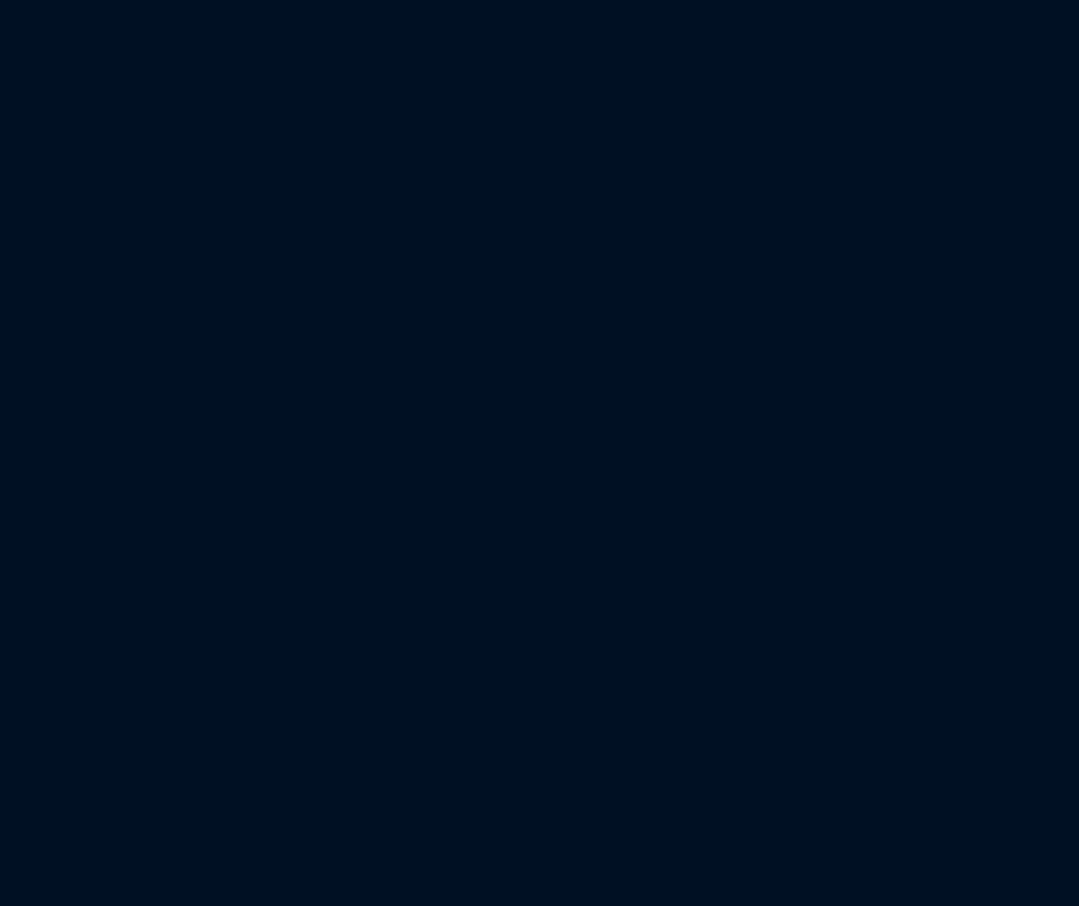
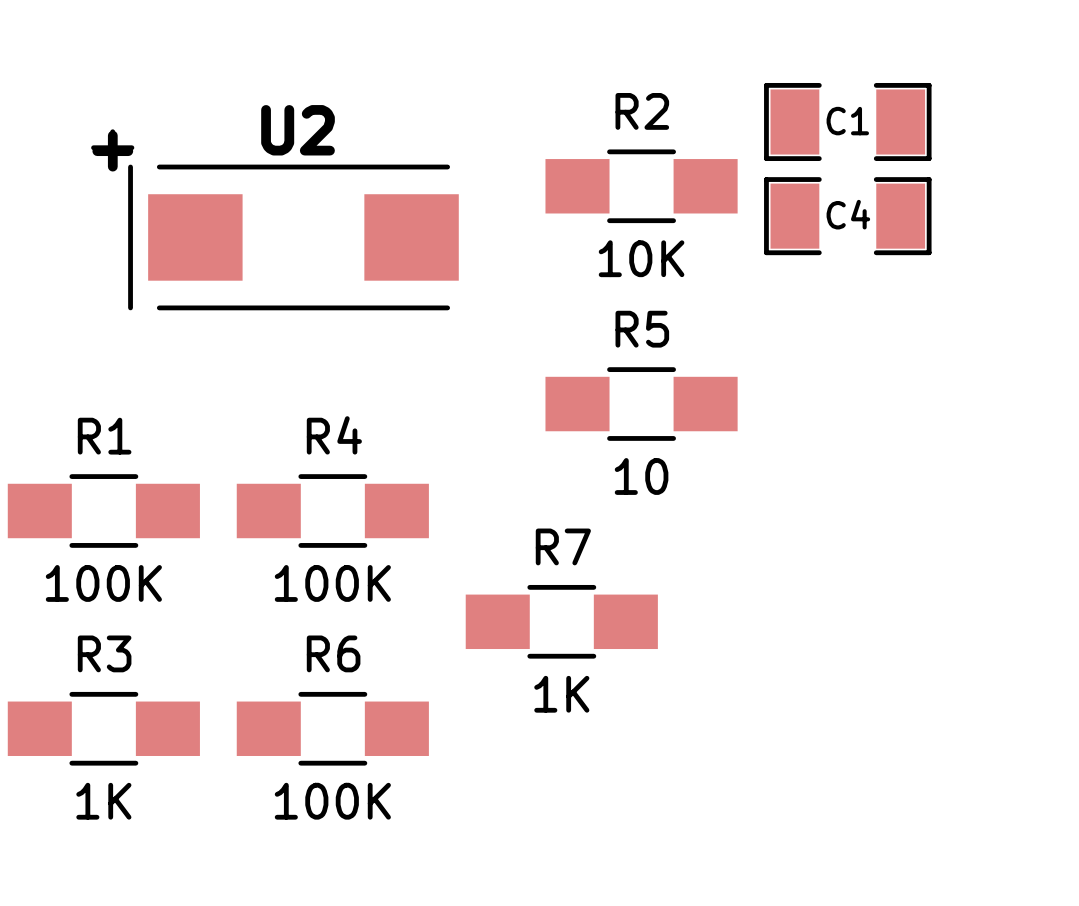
C1: none -> (847, 121)
R2: none -> 10K (641, 186)
C4: none -> (847, 216)
U2: none -> (274, 219)
R5: none -> 10 (641, 404)
R1: none -> 100K (103, 510)
R4: none -> 100K (332, 510)
R7: none -> 1K (561, 621)
R3: none -> 1K (103, 728)
R6: none -> 100K (332, 728)

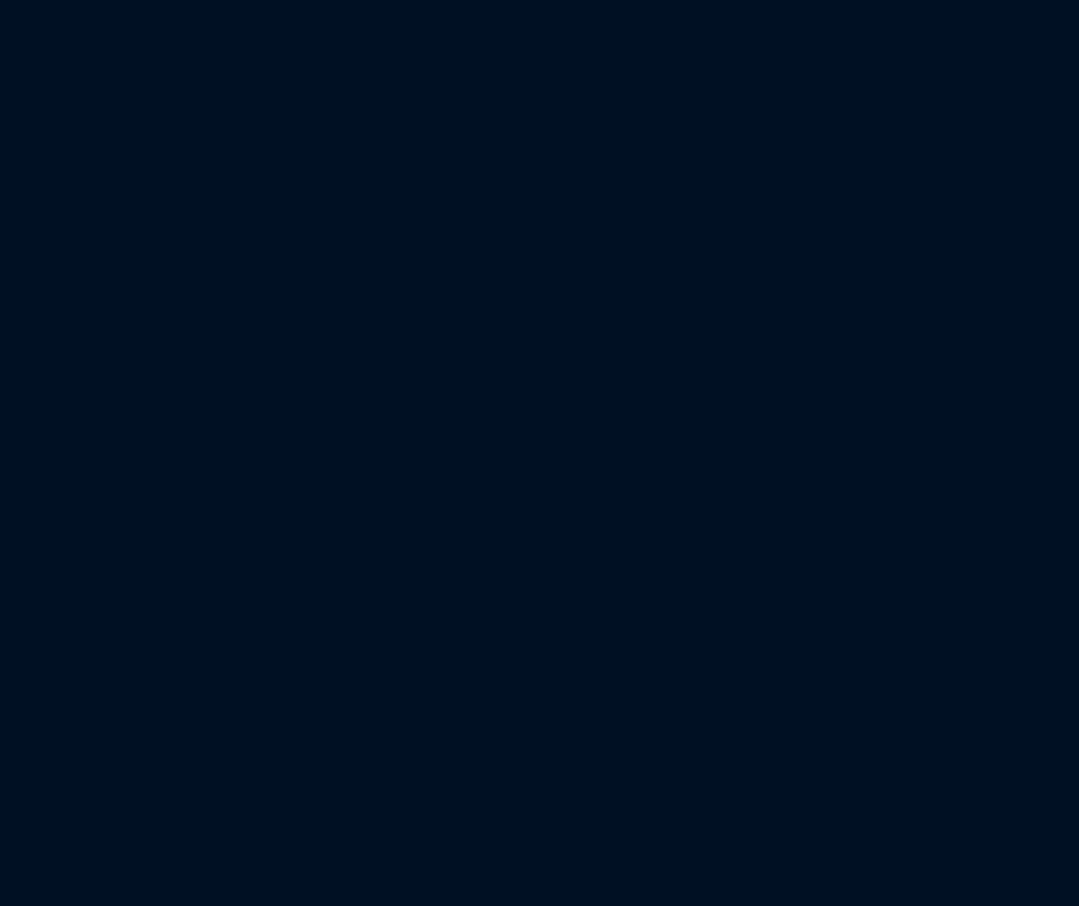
C1: (847, 121) -> none
R2: 10K (641, 186) -> none
C4: (847, 216) -> none
U2: (274, 219) -> none
R5: 10 (641, 404) -> none
R1: 100K (103, 510) -> none
R4: 100K (332, 510) -> none
R7: 1K (561, 621) -> none
R3: 1K (103, 728) -> none
R6: 100K (332, 728) -> none

